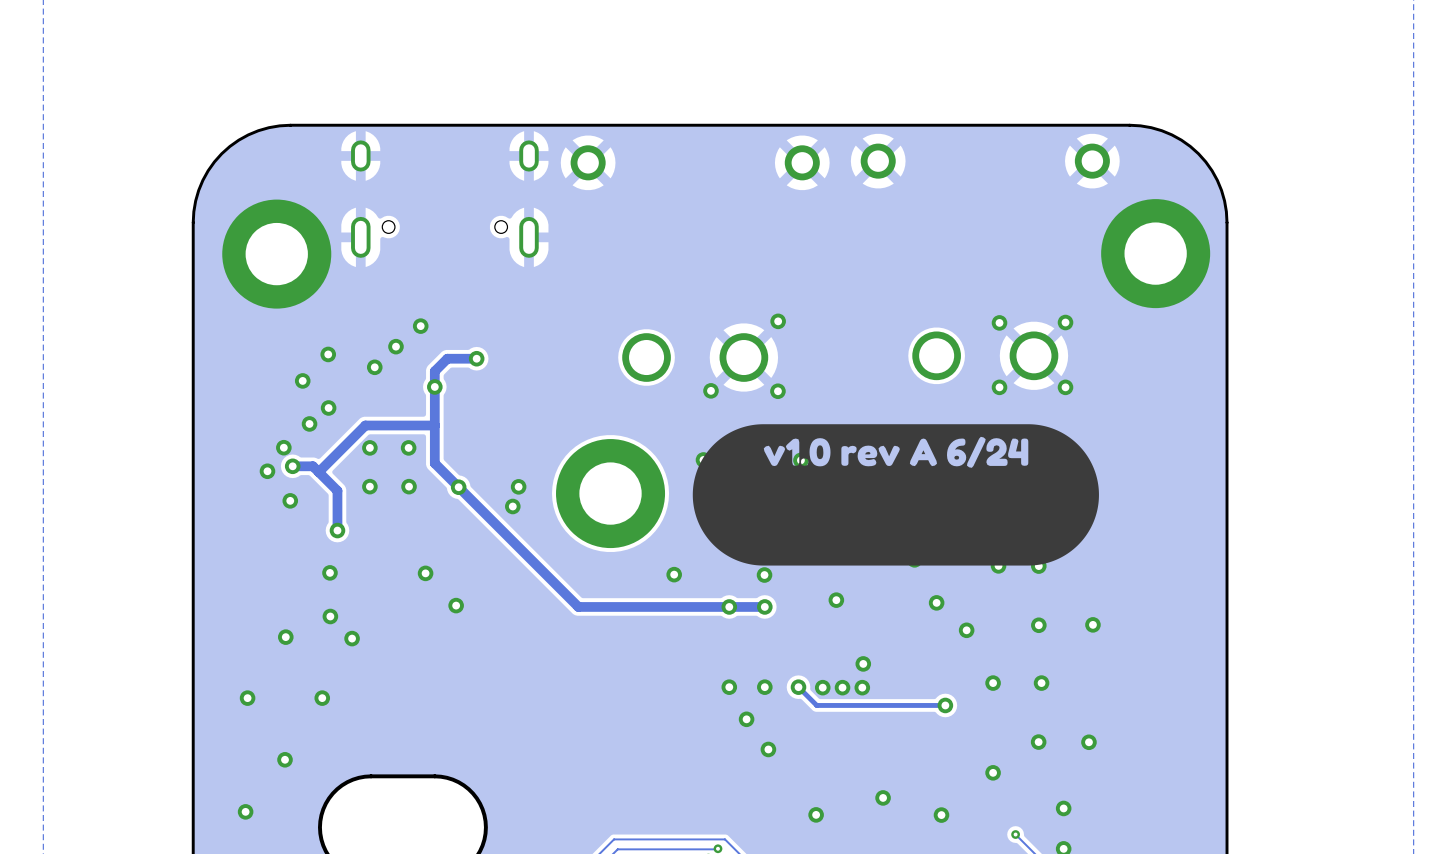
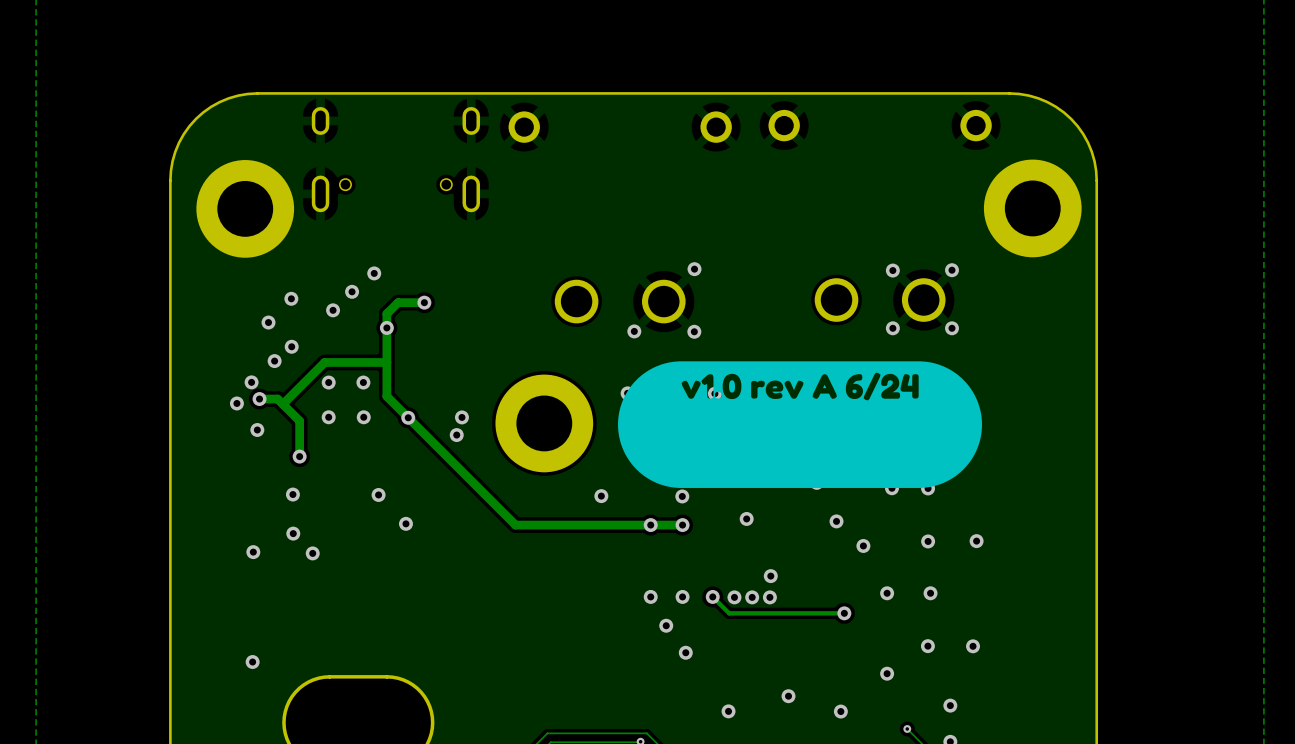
via: (247, 698) -> none
via: (322, 698) -> none
via: (245, 811) -> none

